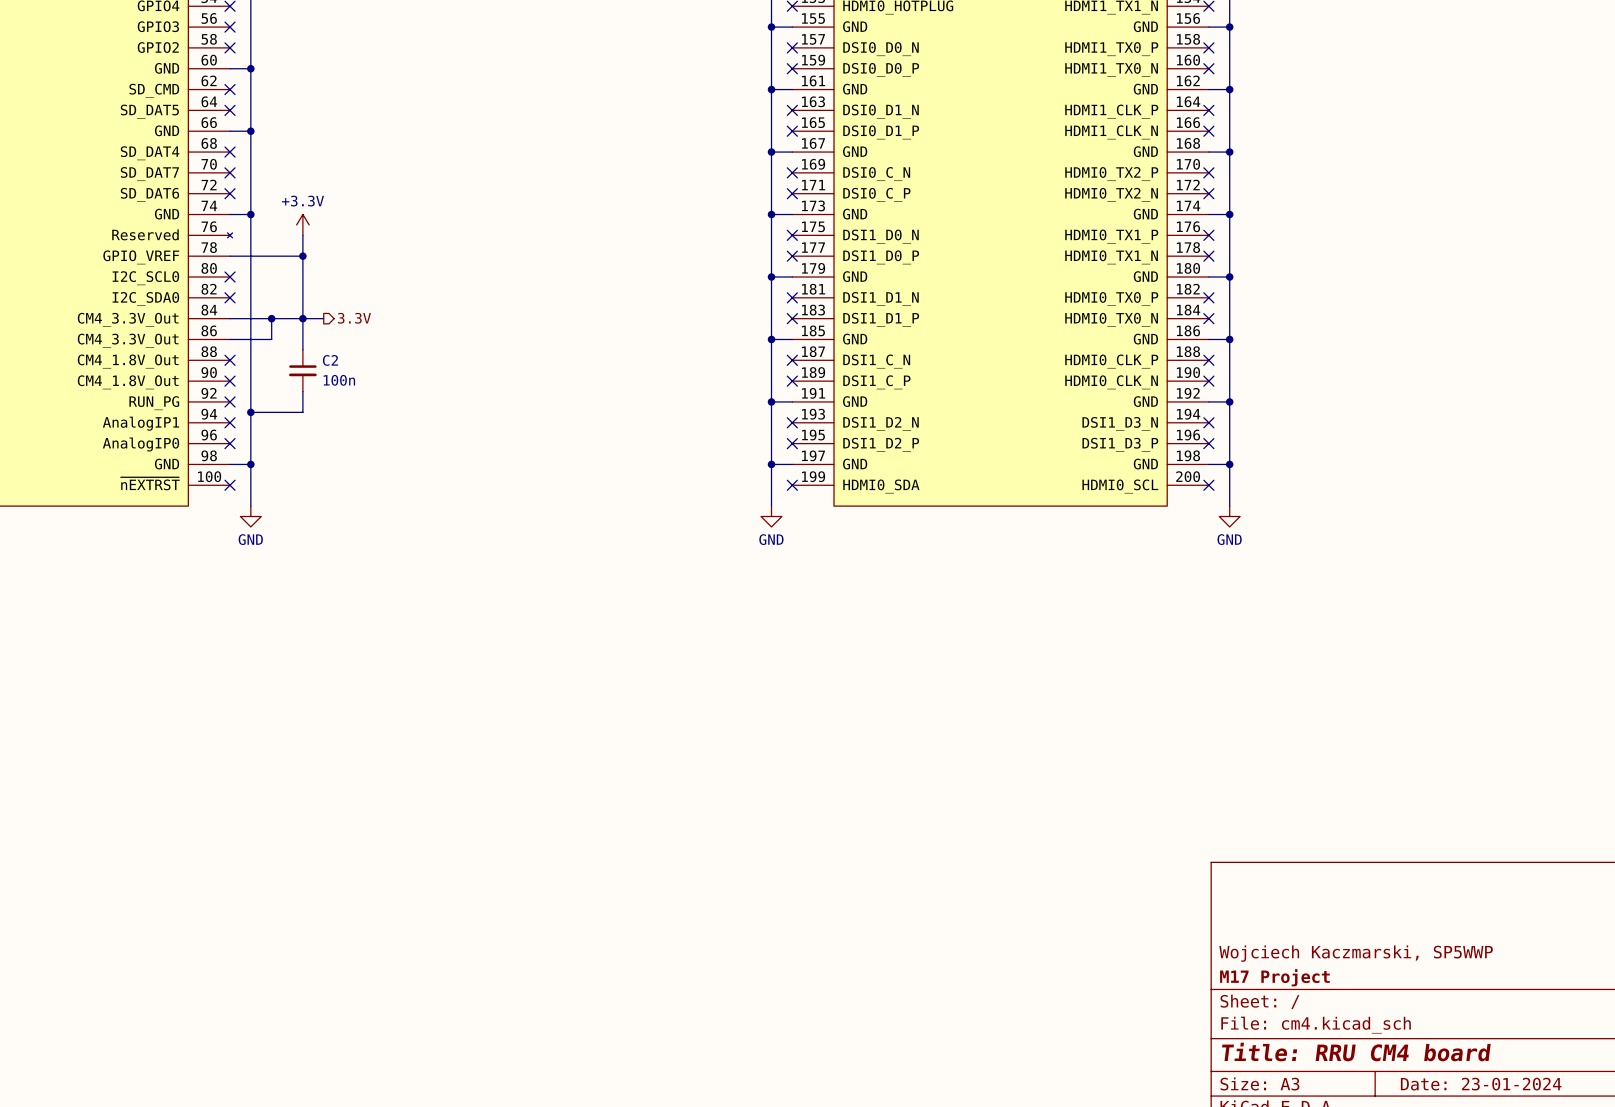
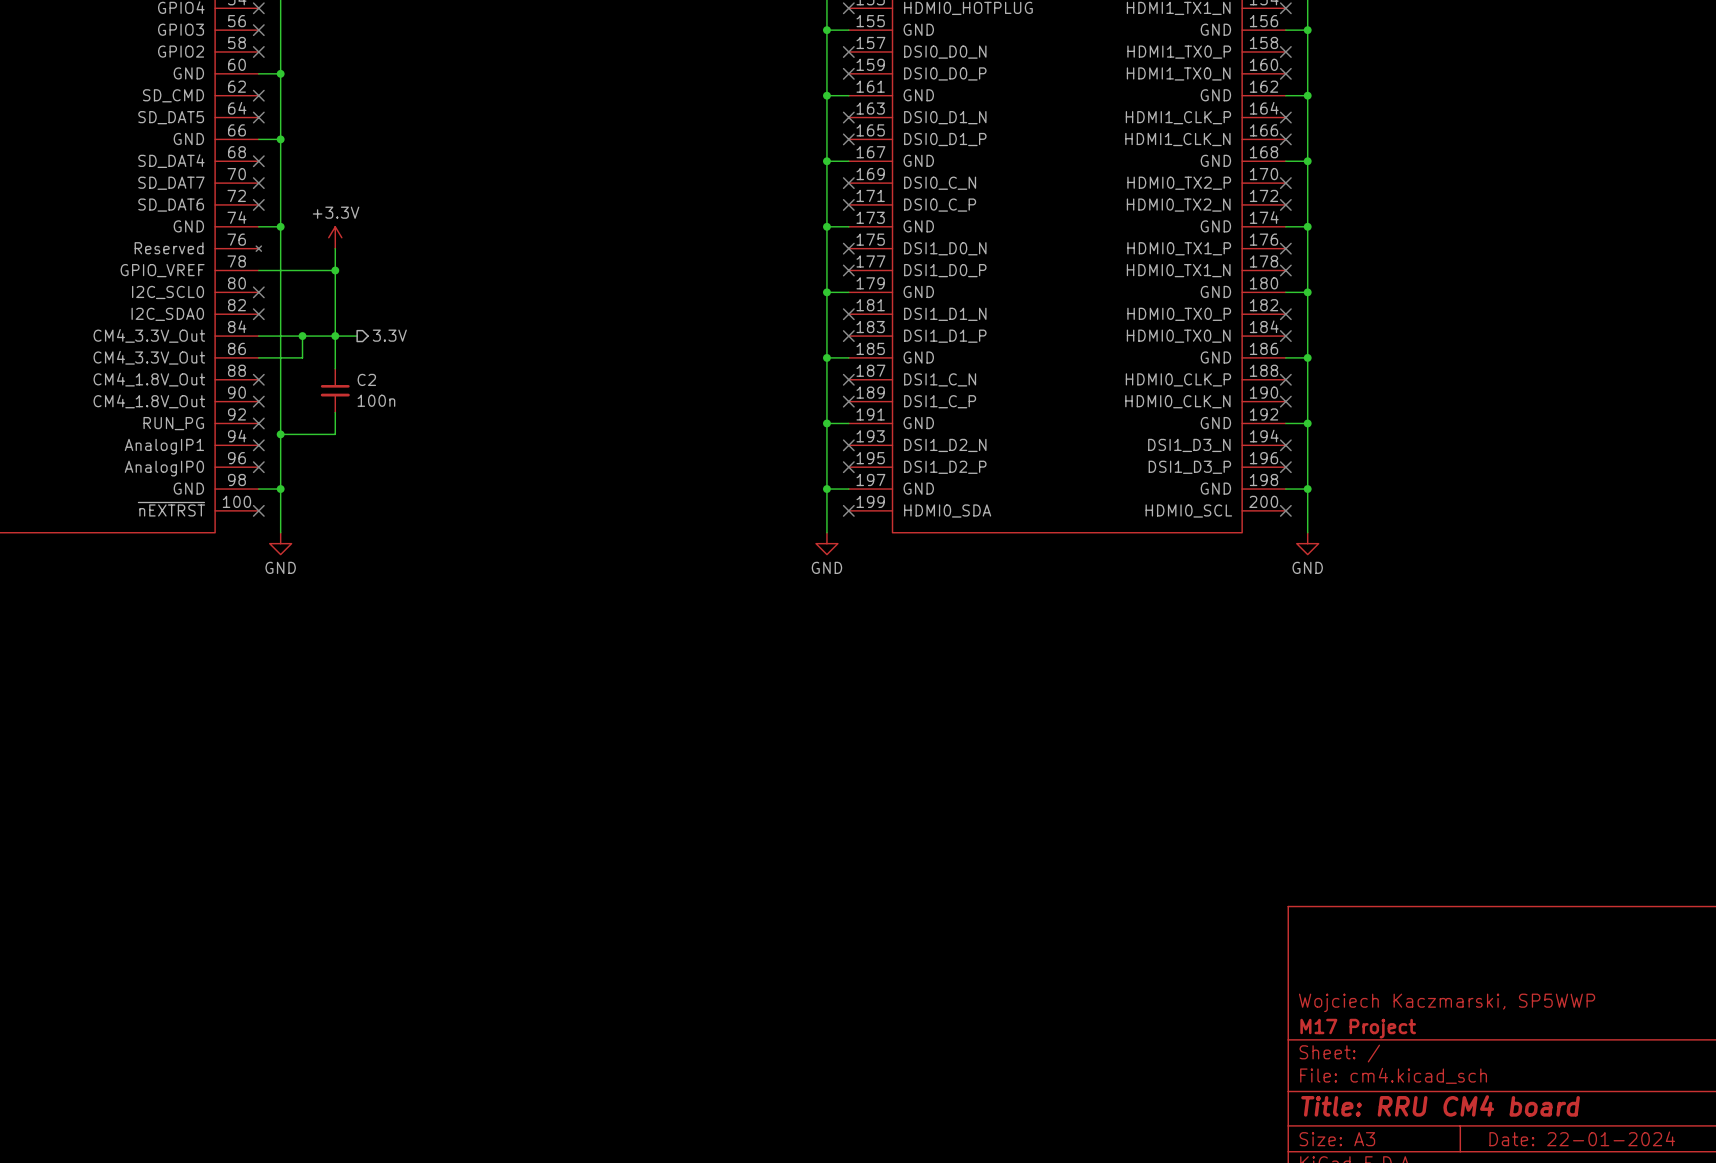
title block: Date: 23-01-2024 (1481, 1084) -> Date: 22-01-2024 (1582, 1138)

